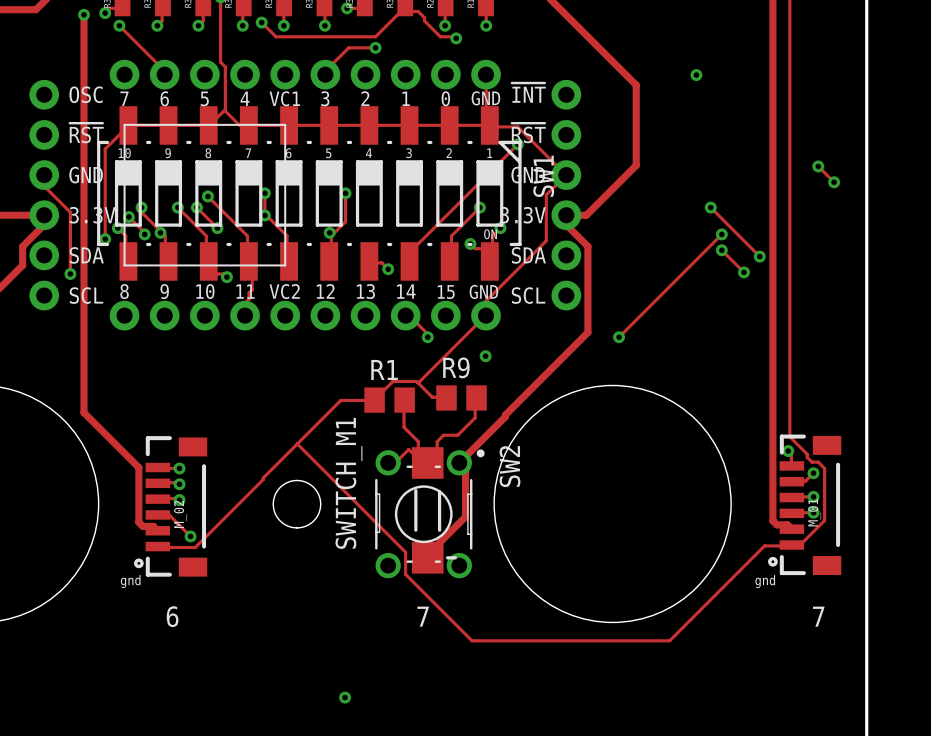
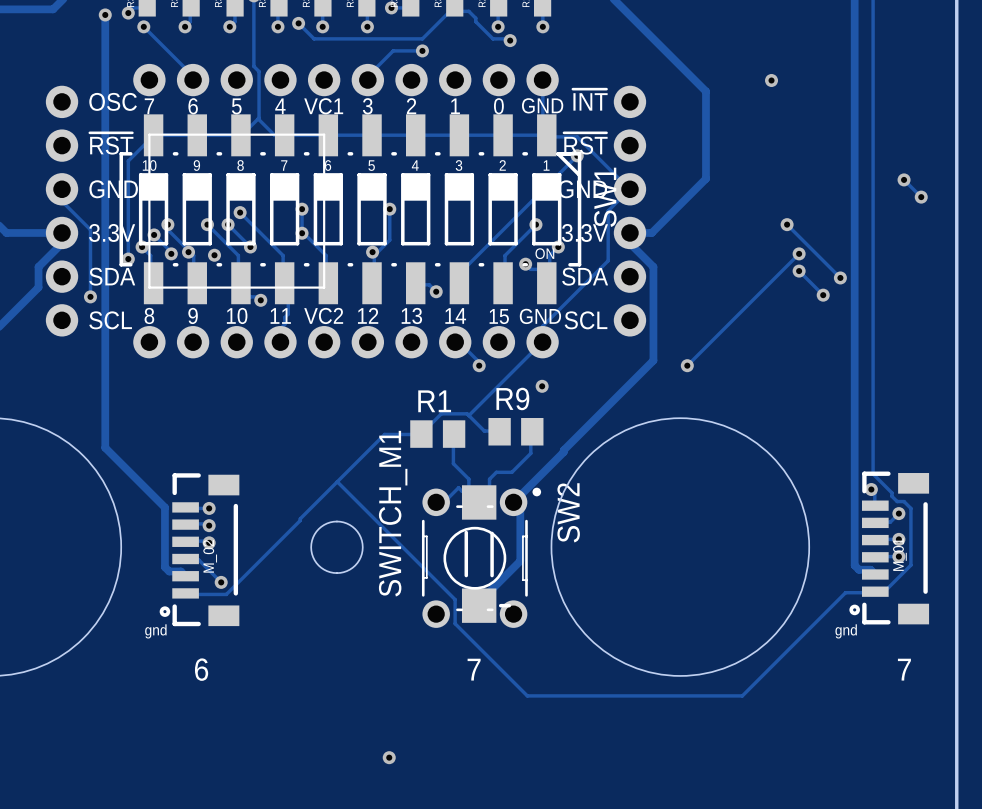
via: none -> (214, 255)

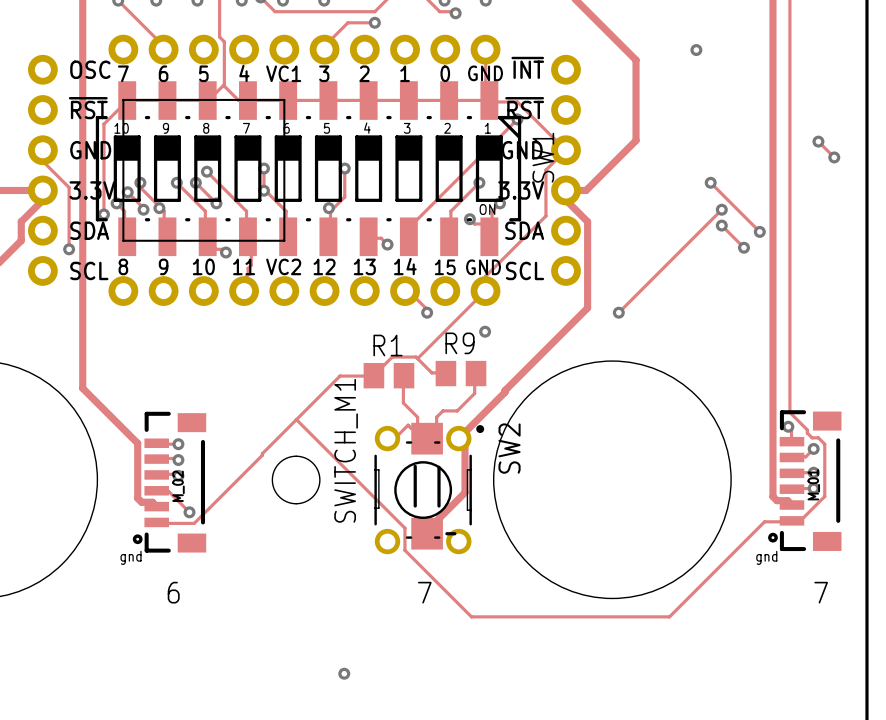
via: (214, 255) -> none

